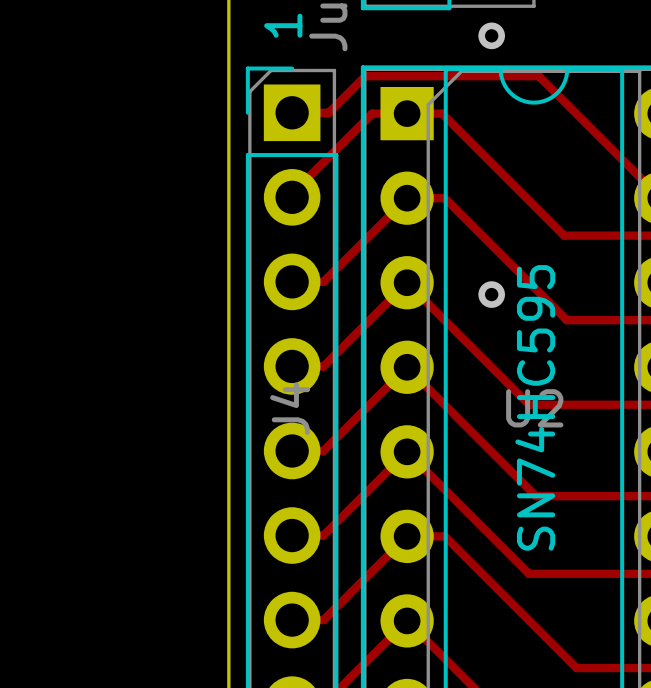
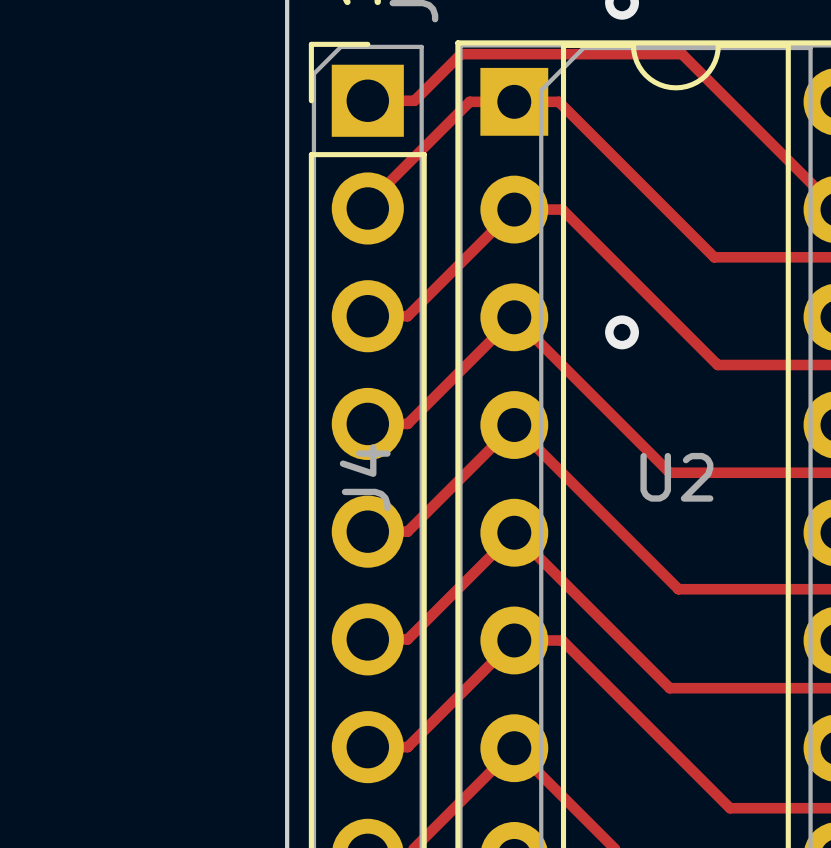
text: SN74HC595 (535, 407) -> none

